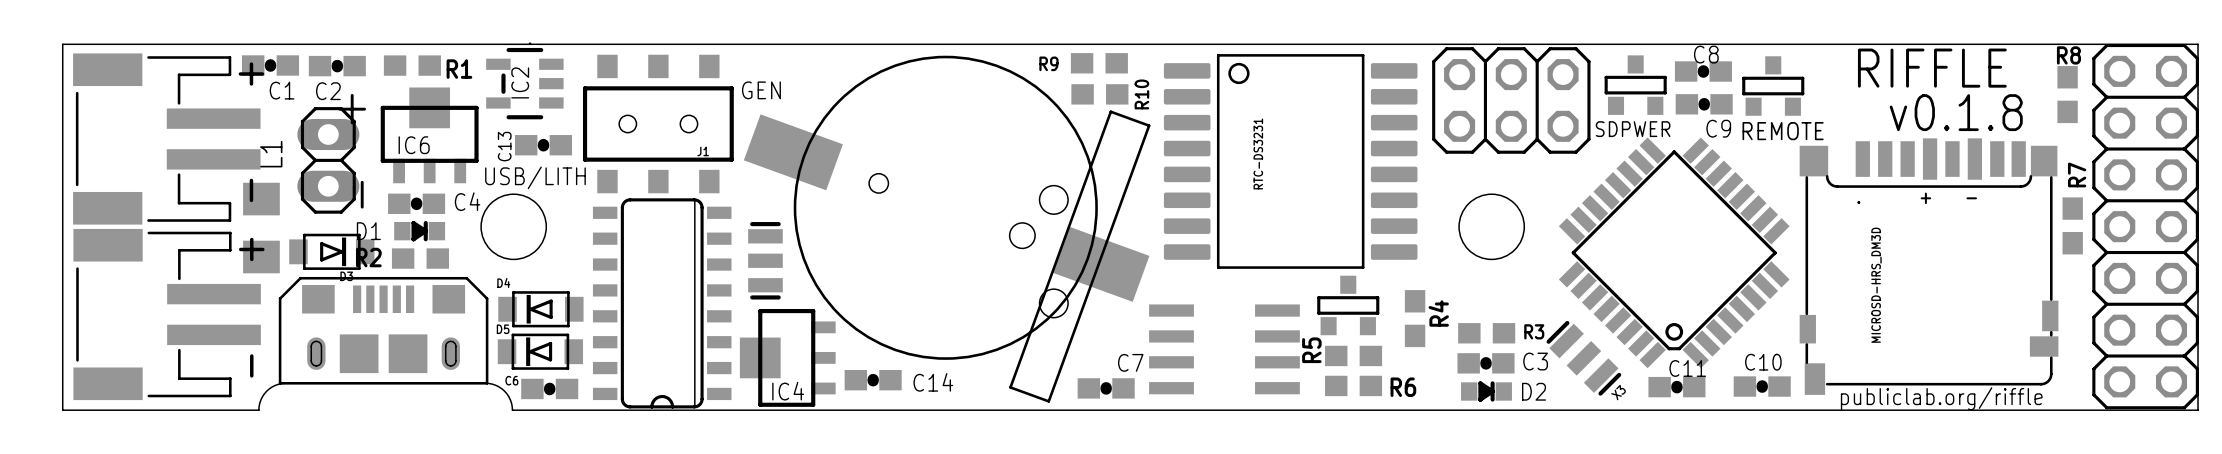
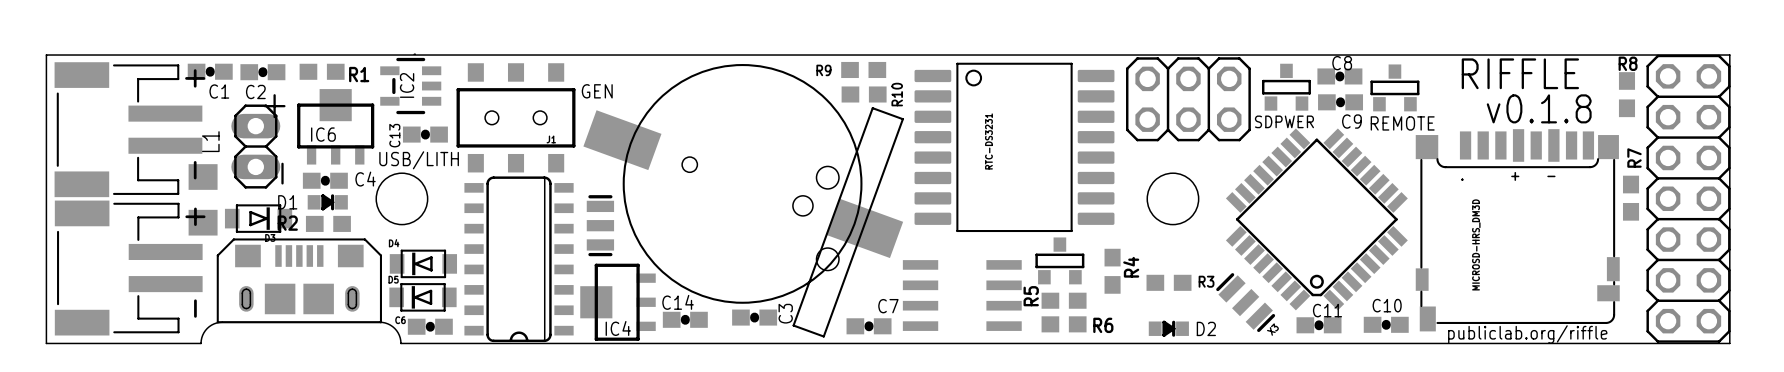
C3 name rotation: 0° (1535, 361) -> 90° counterclockwise (785, 313)
C3 position: (1486, 363) -> (754, 317)
C14 name position: C14 (933, 382) -> C14 (678, 302)

